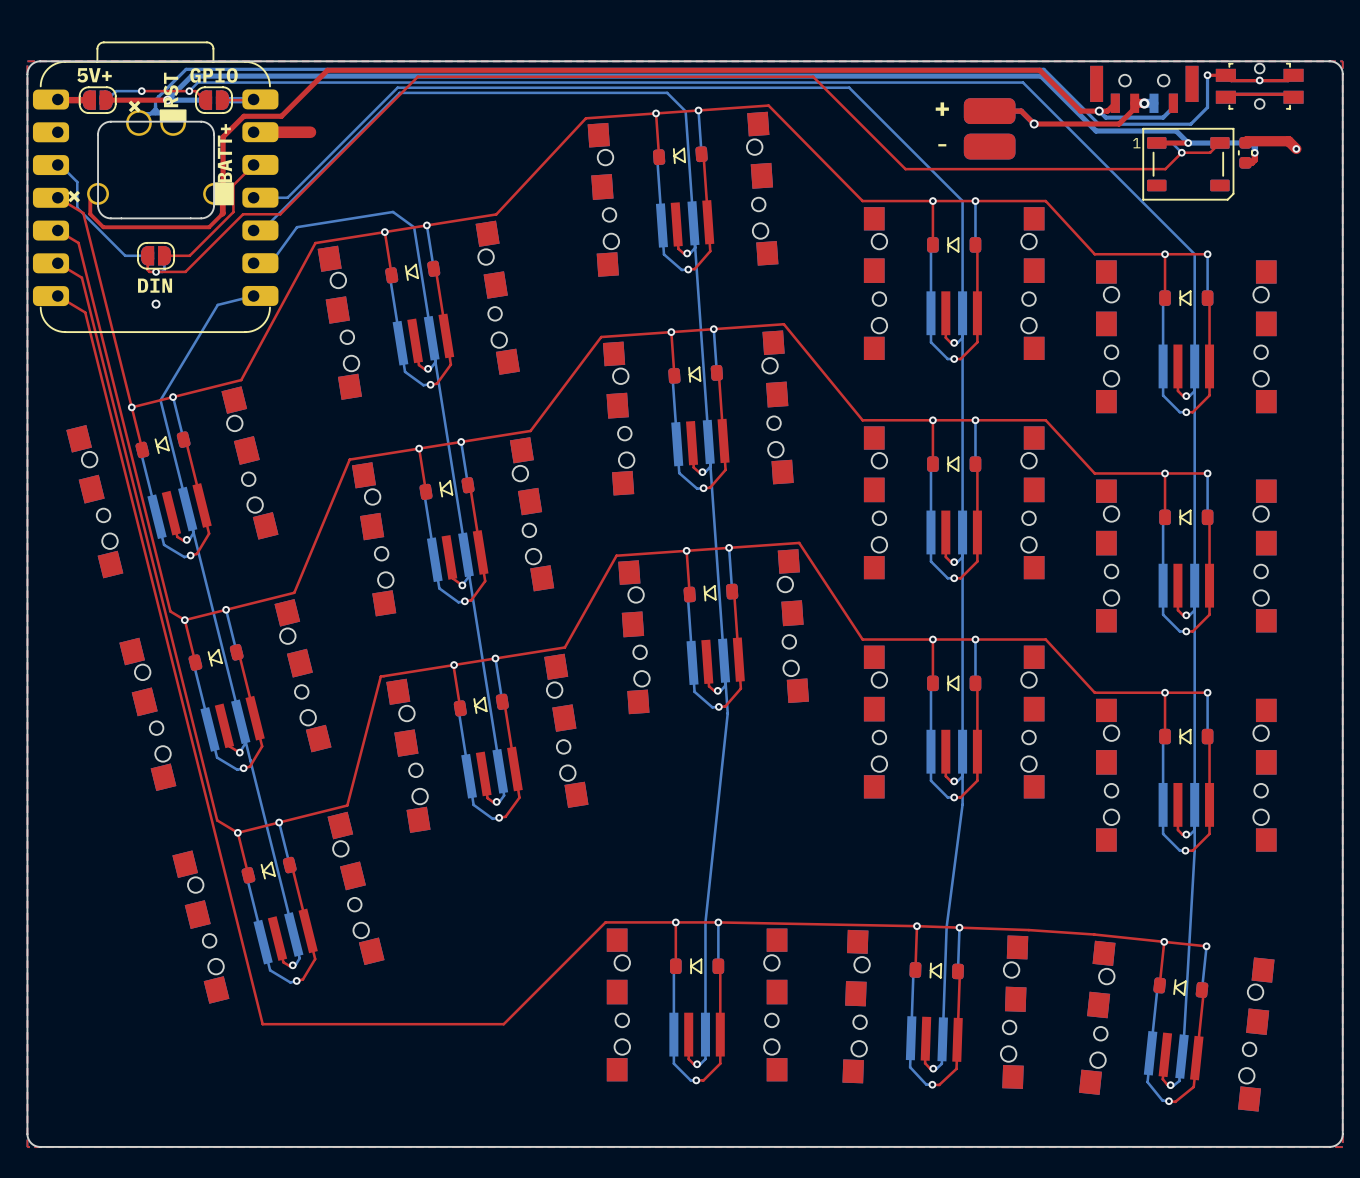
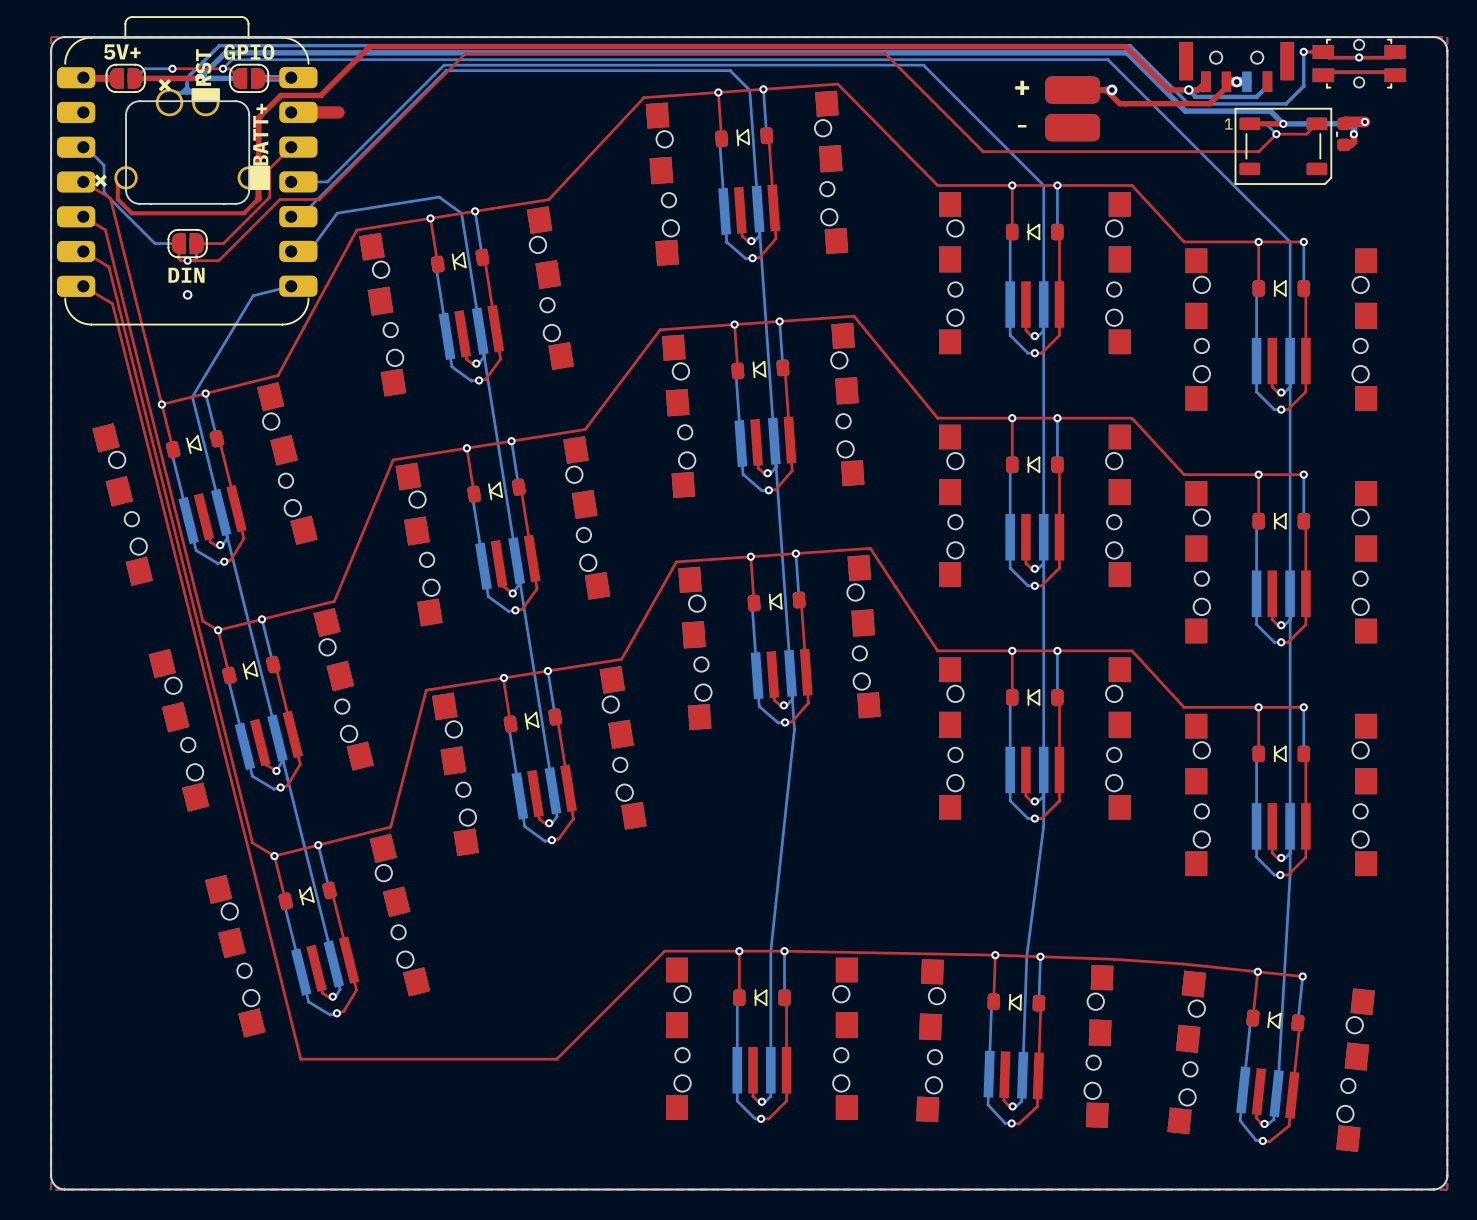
via: none -> (1111, 89)
via: (1034, 124) -> none
top track: (298, 132) (310, 132) -> none
top track: (1265, 141) (1288, 141) (1296, 148) -> none
via position: (1296, 148) -> (1364, 121)

